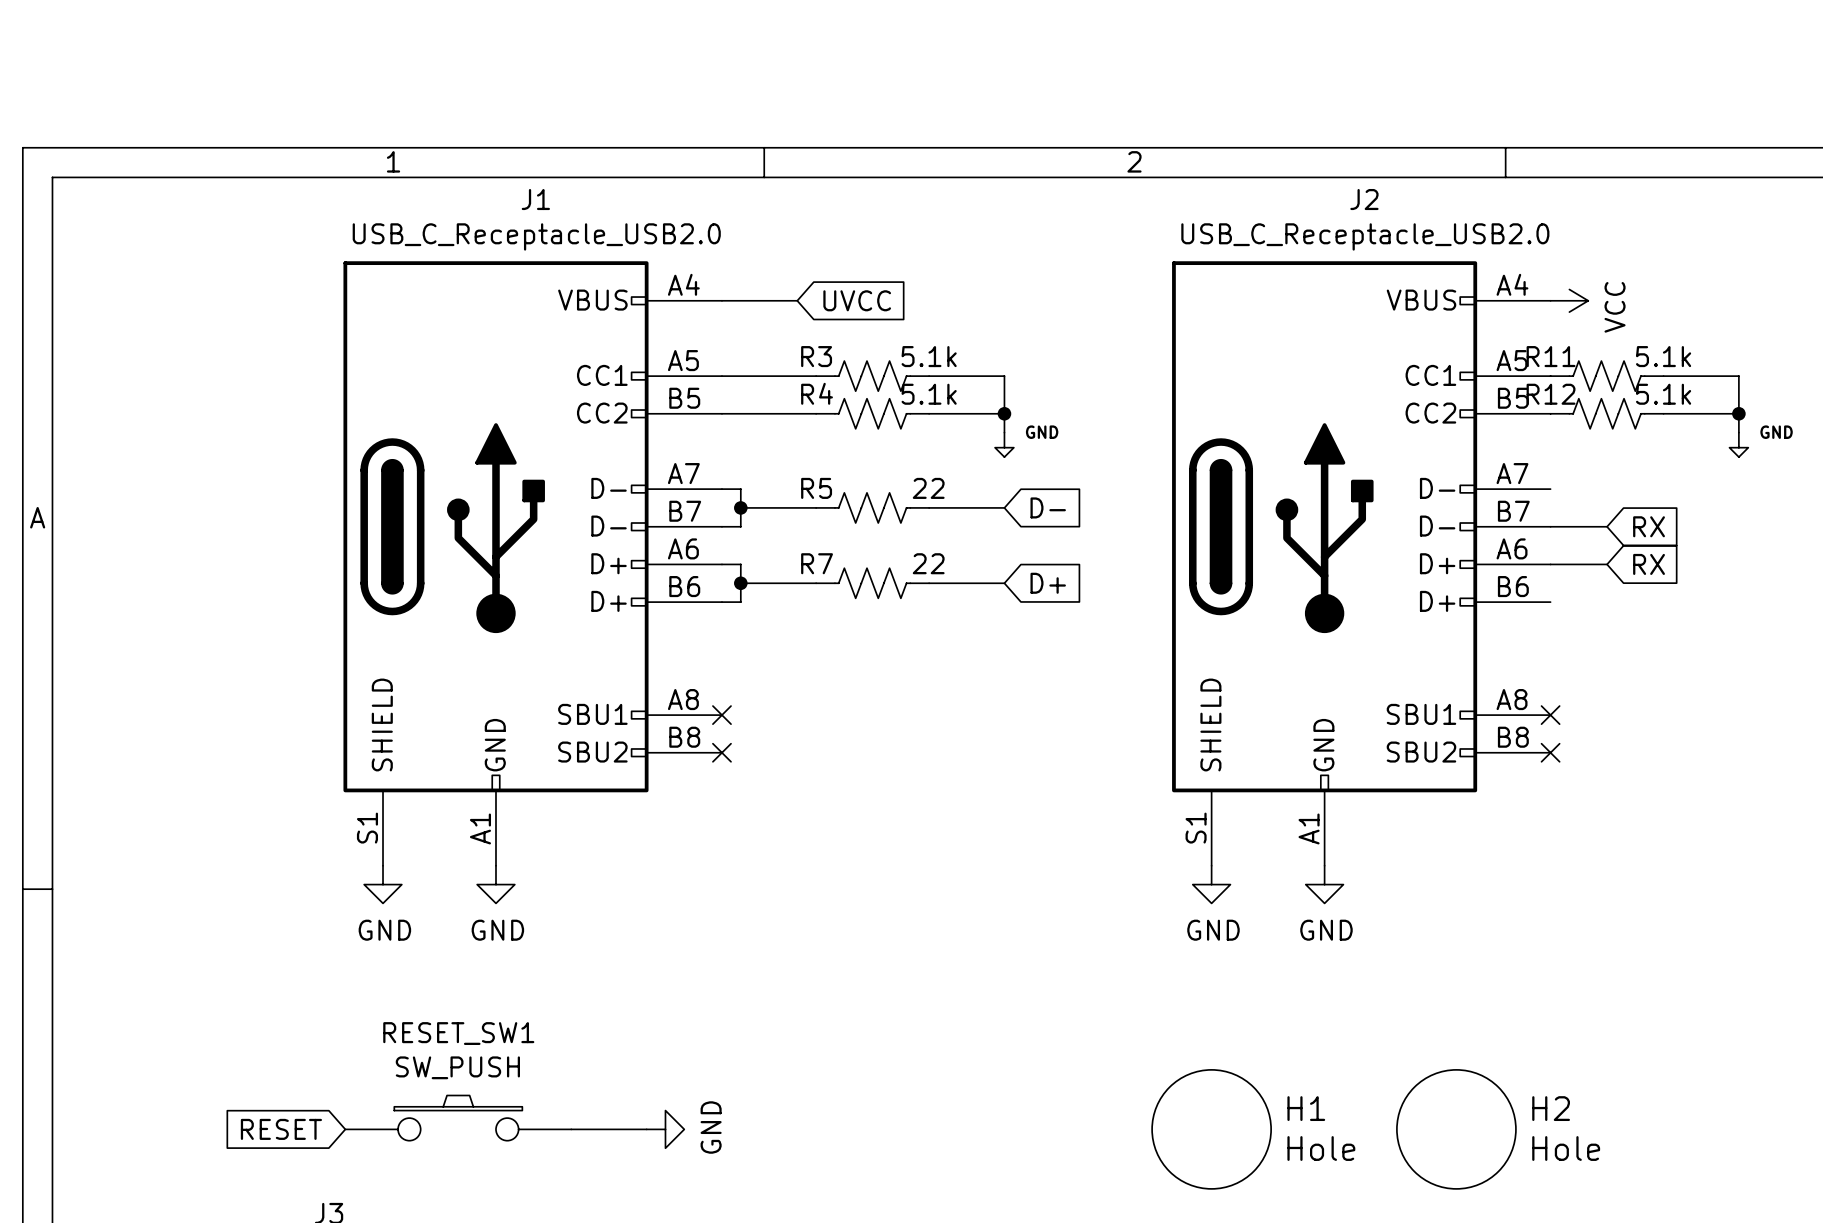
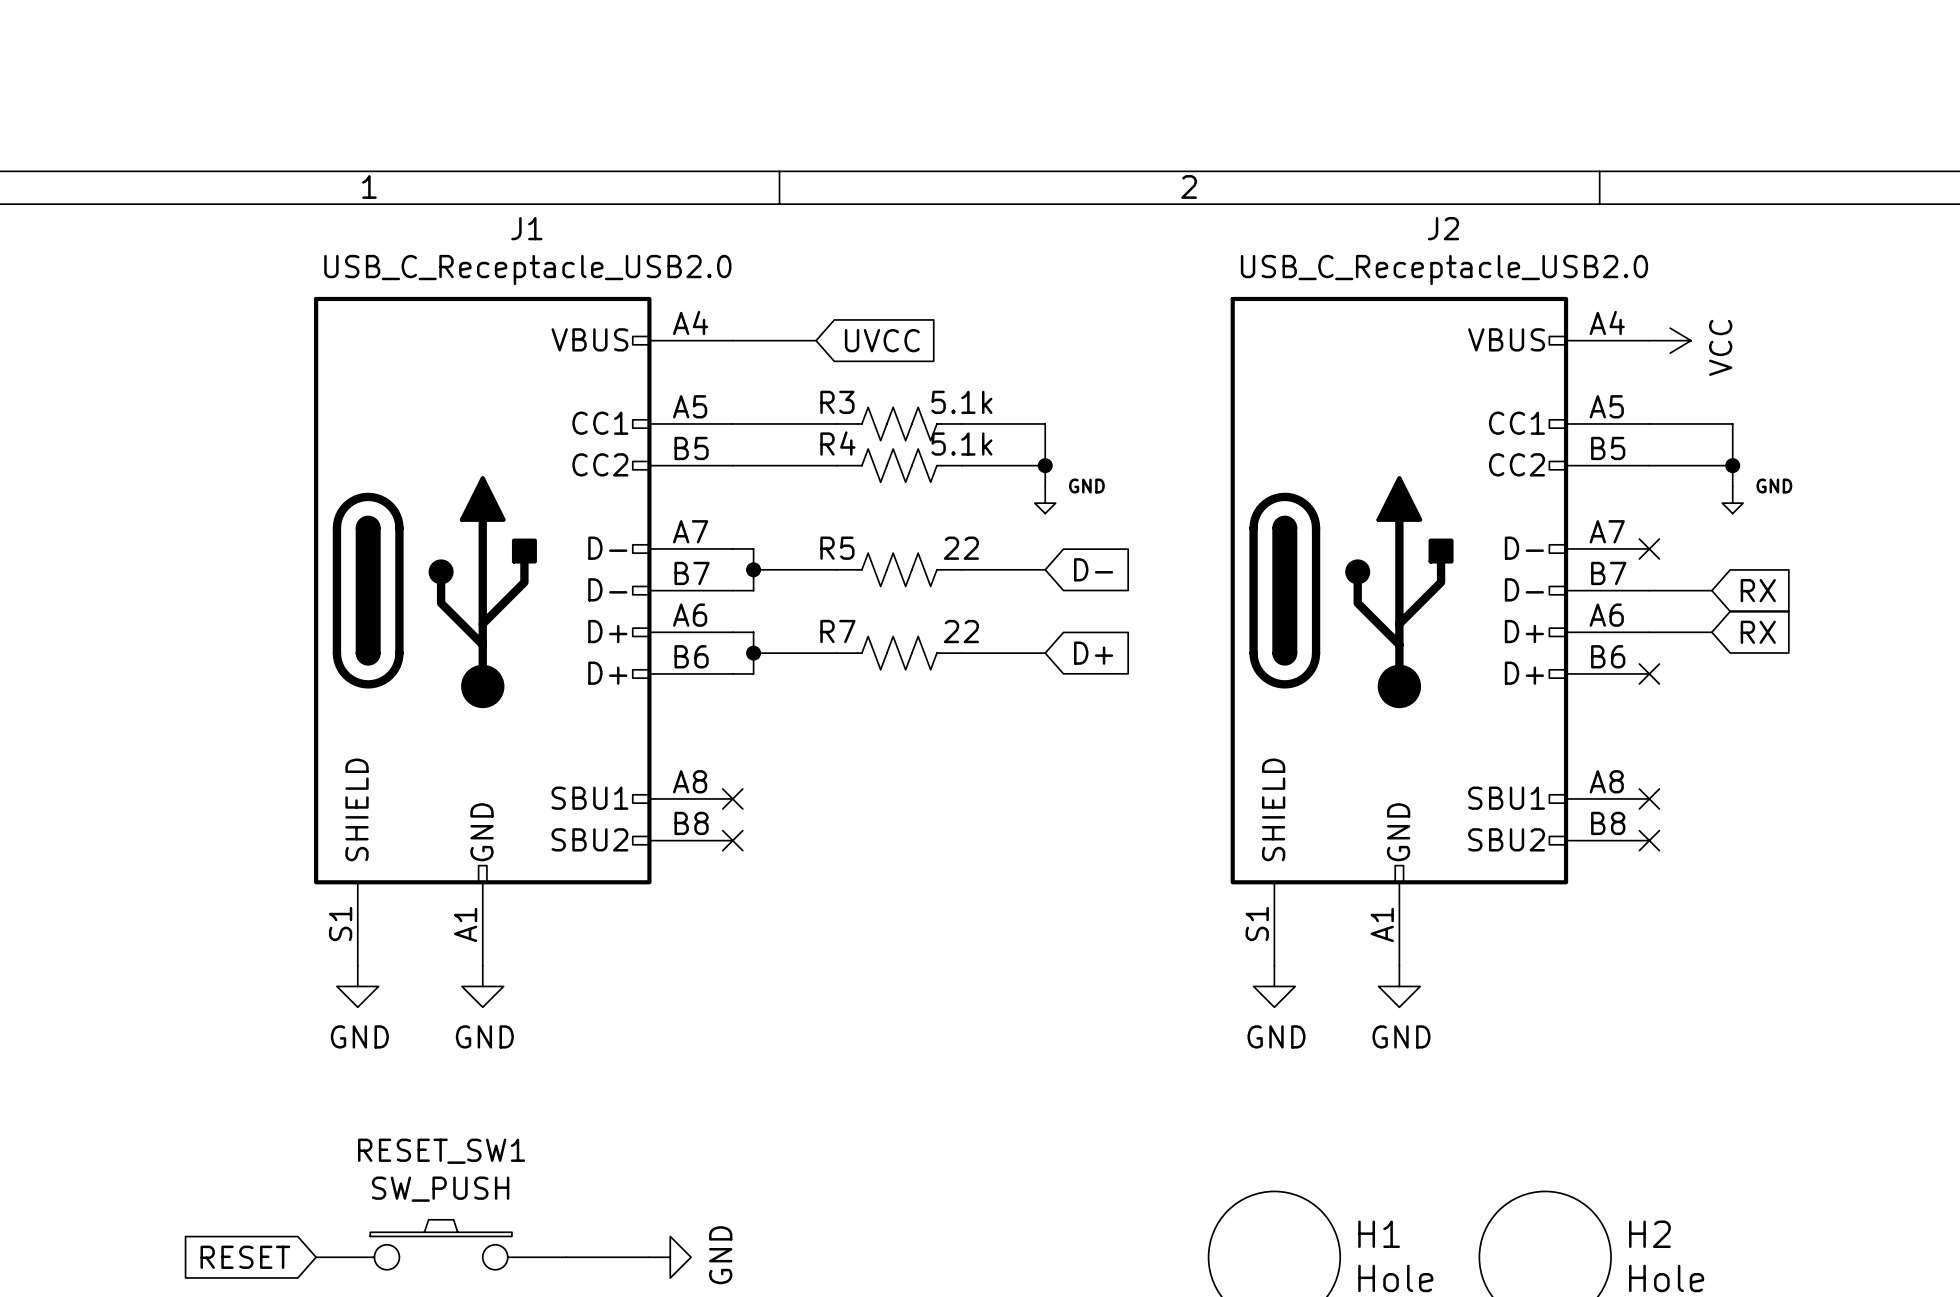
R11: 5.1k (1607, 376) -> none
wire: (1663, 376) (1738, 376) (1738, 432) -> (1649, 423) (1732, 423) (1732, 486)
R12: 5.1k (1607, 413) -> none
junction: none -> (1732, 465)
wire: (1663, 413) (1738, 413) -> (1649, 465) (1732, 465)
junction: (1738, 413) -> none
power symbol position: GND (1738, 444) -> GND (1732, 500)
no-connect mark: none -> (1649, 548)
no-connect mark: none -> (1649, 673)

